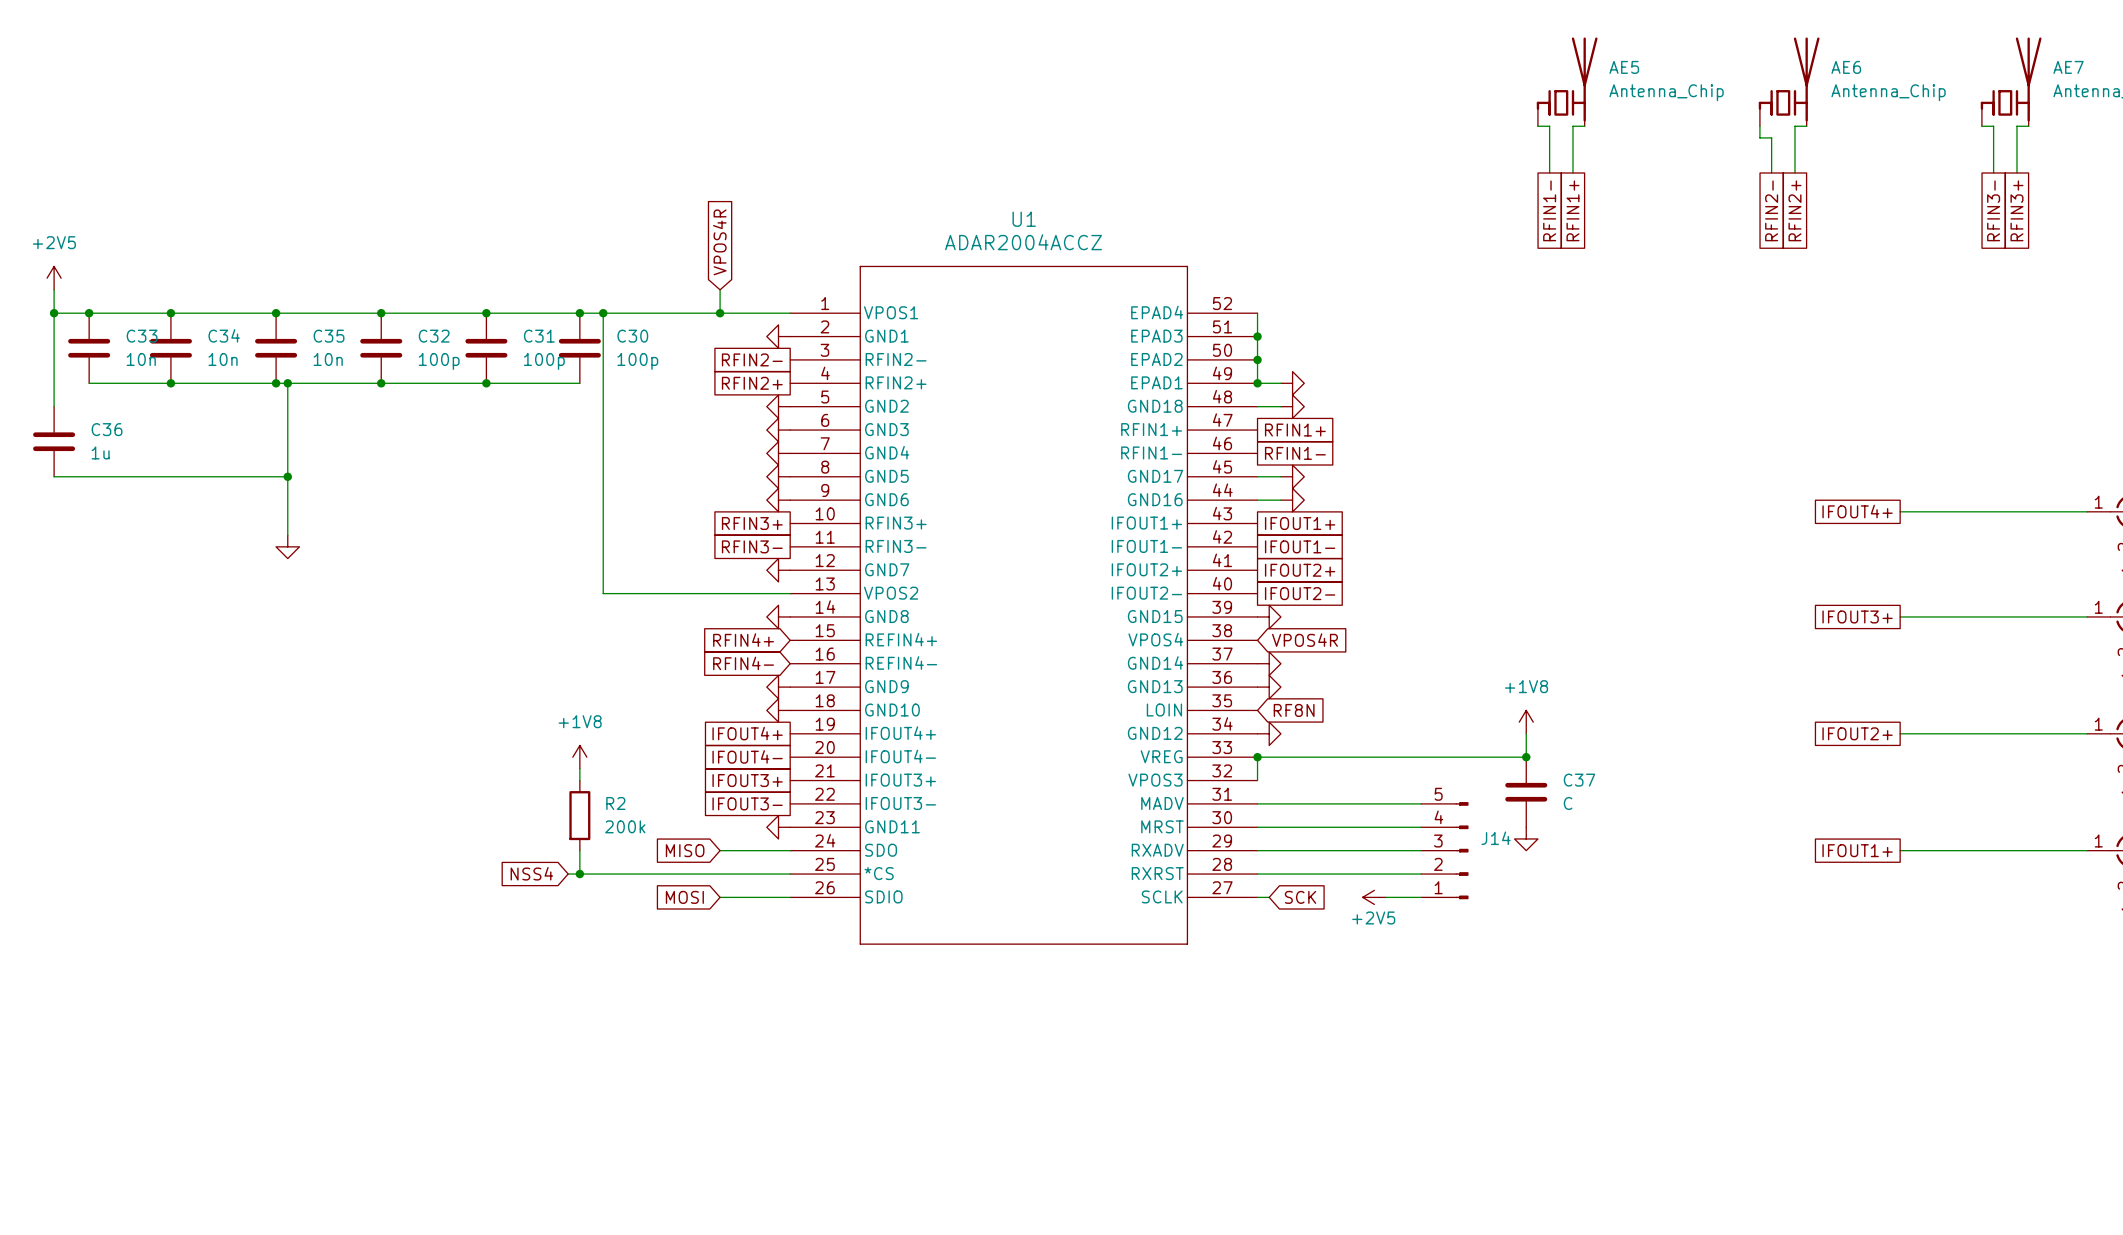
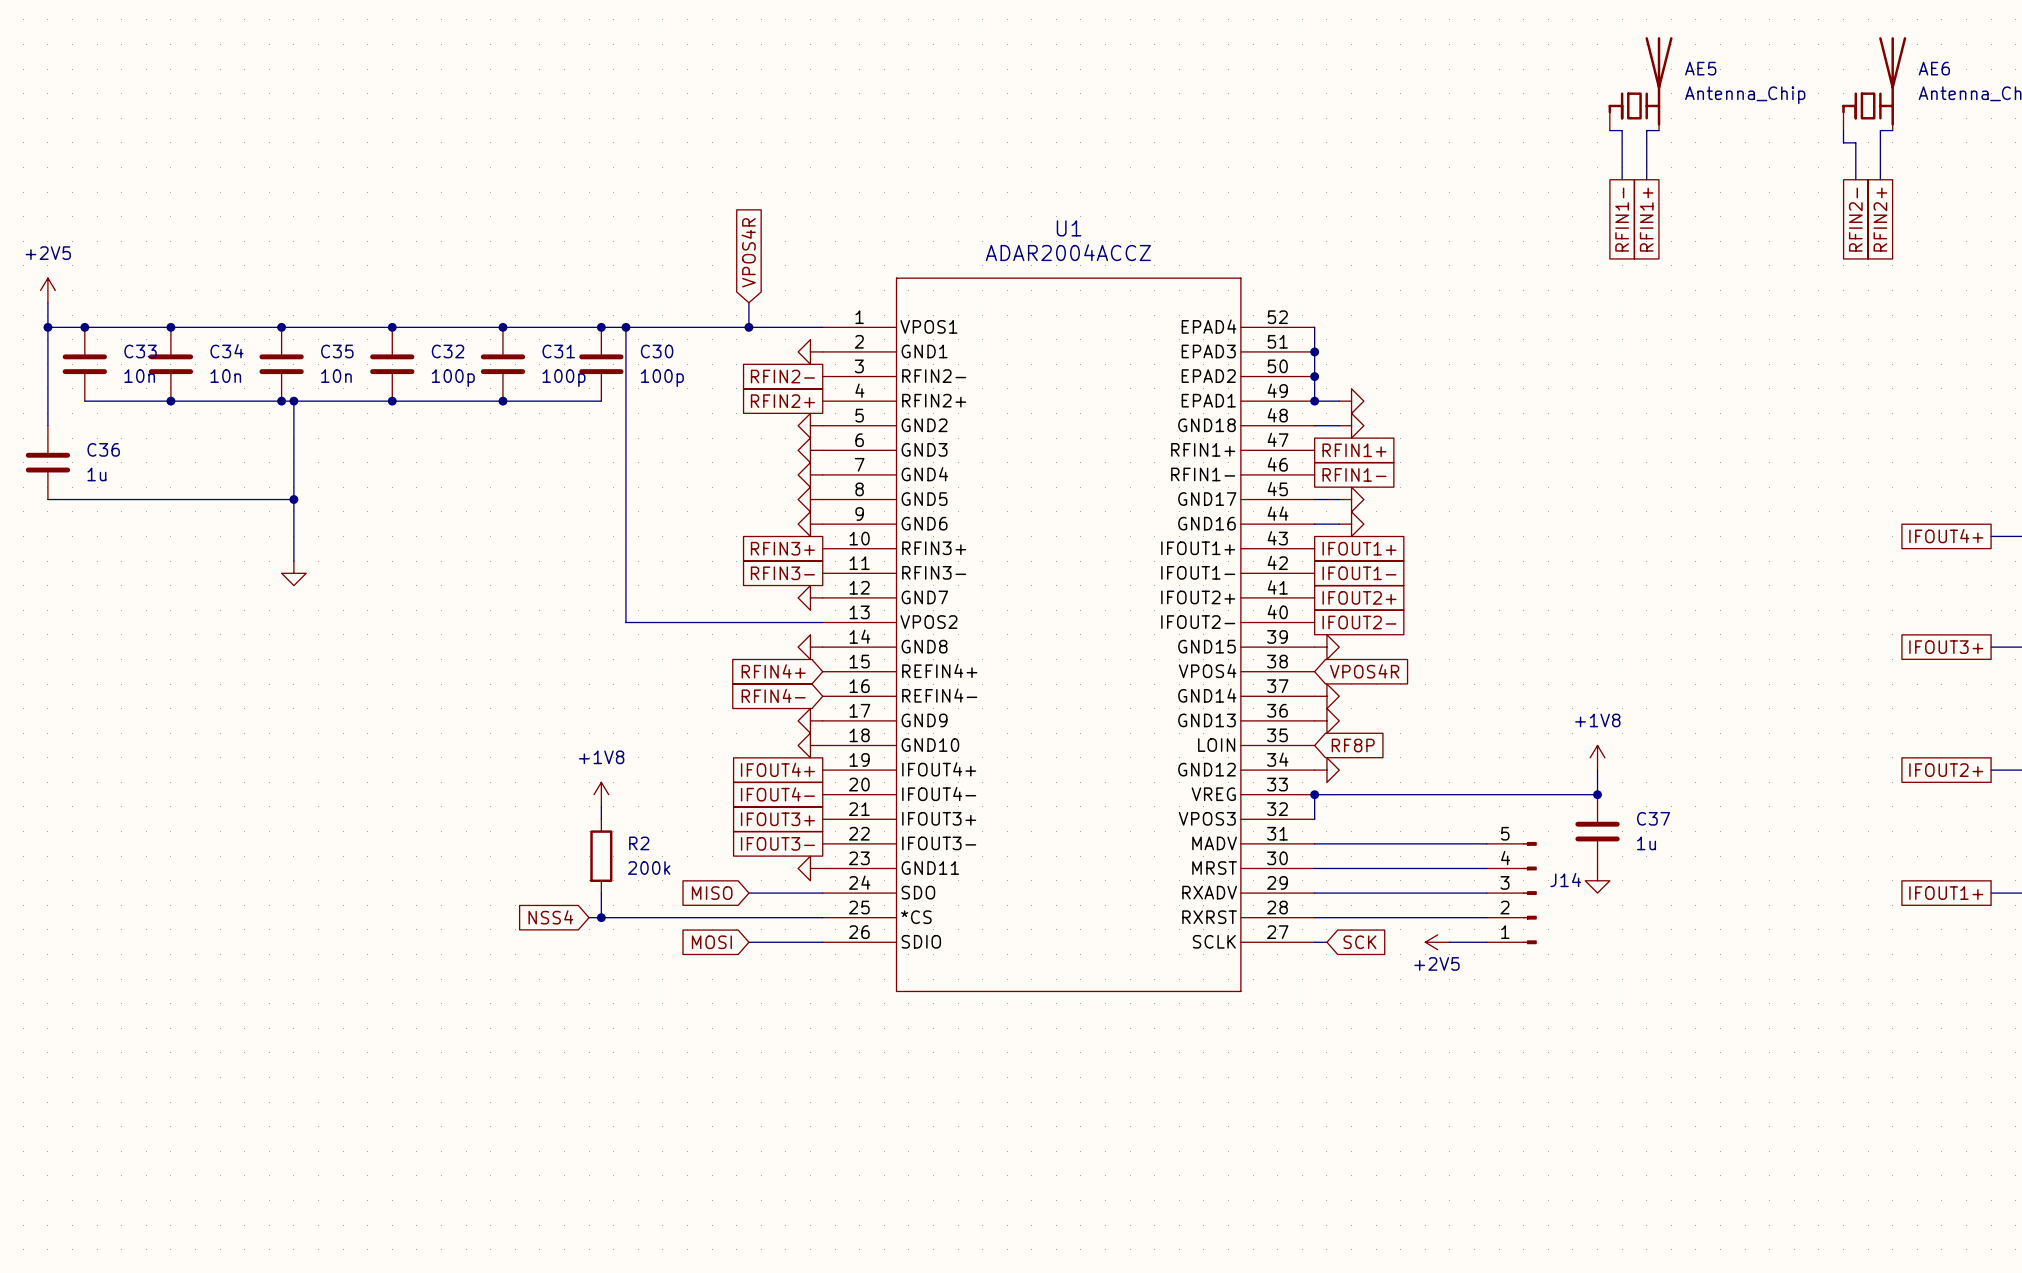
global label: RF8N (1294, 710) -> RF8P (1353, 745)
C37 value: C (1568, 803) -> 1u (1646, 843)

